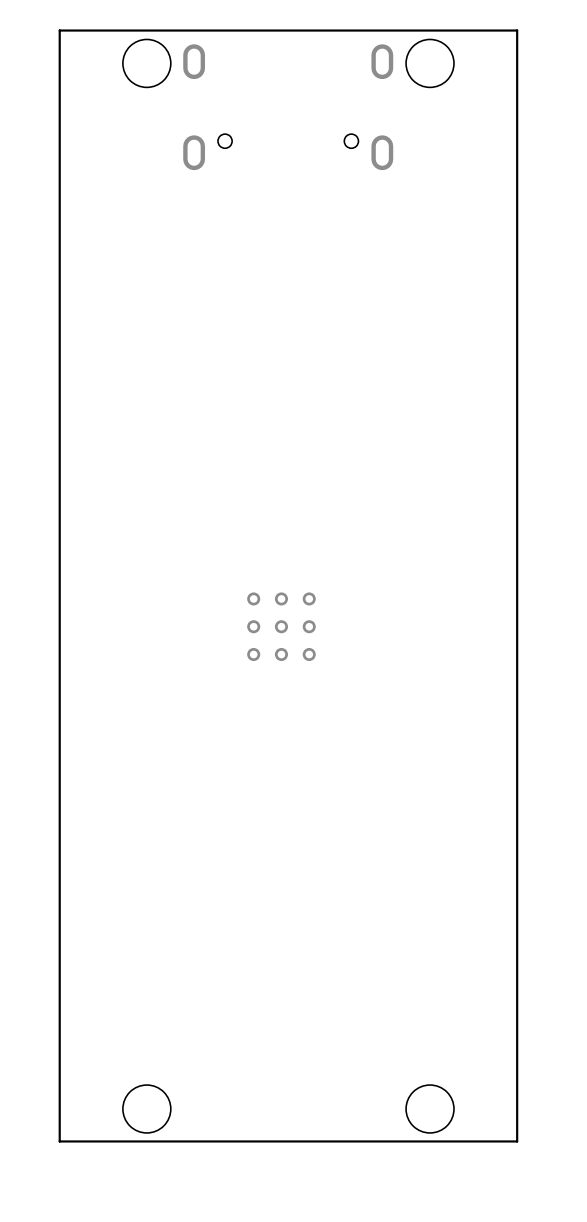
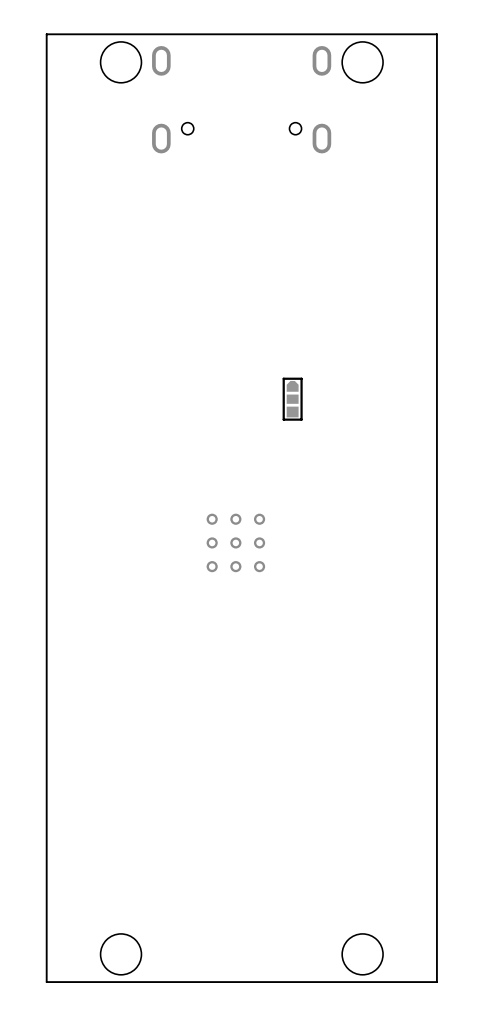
part: none -> (292, 399)

